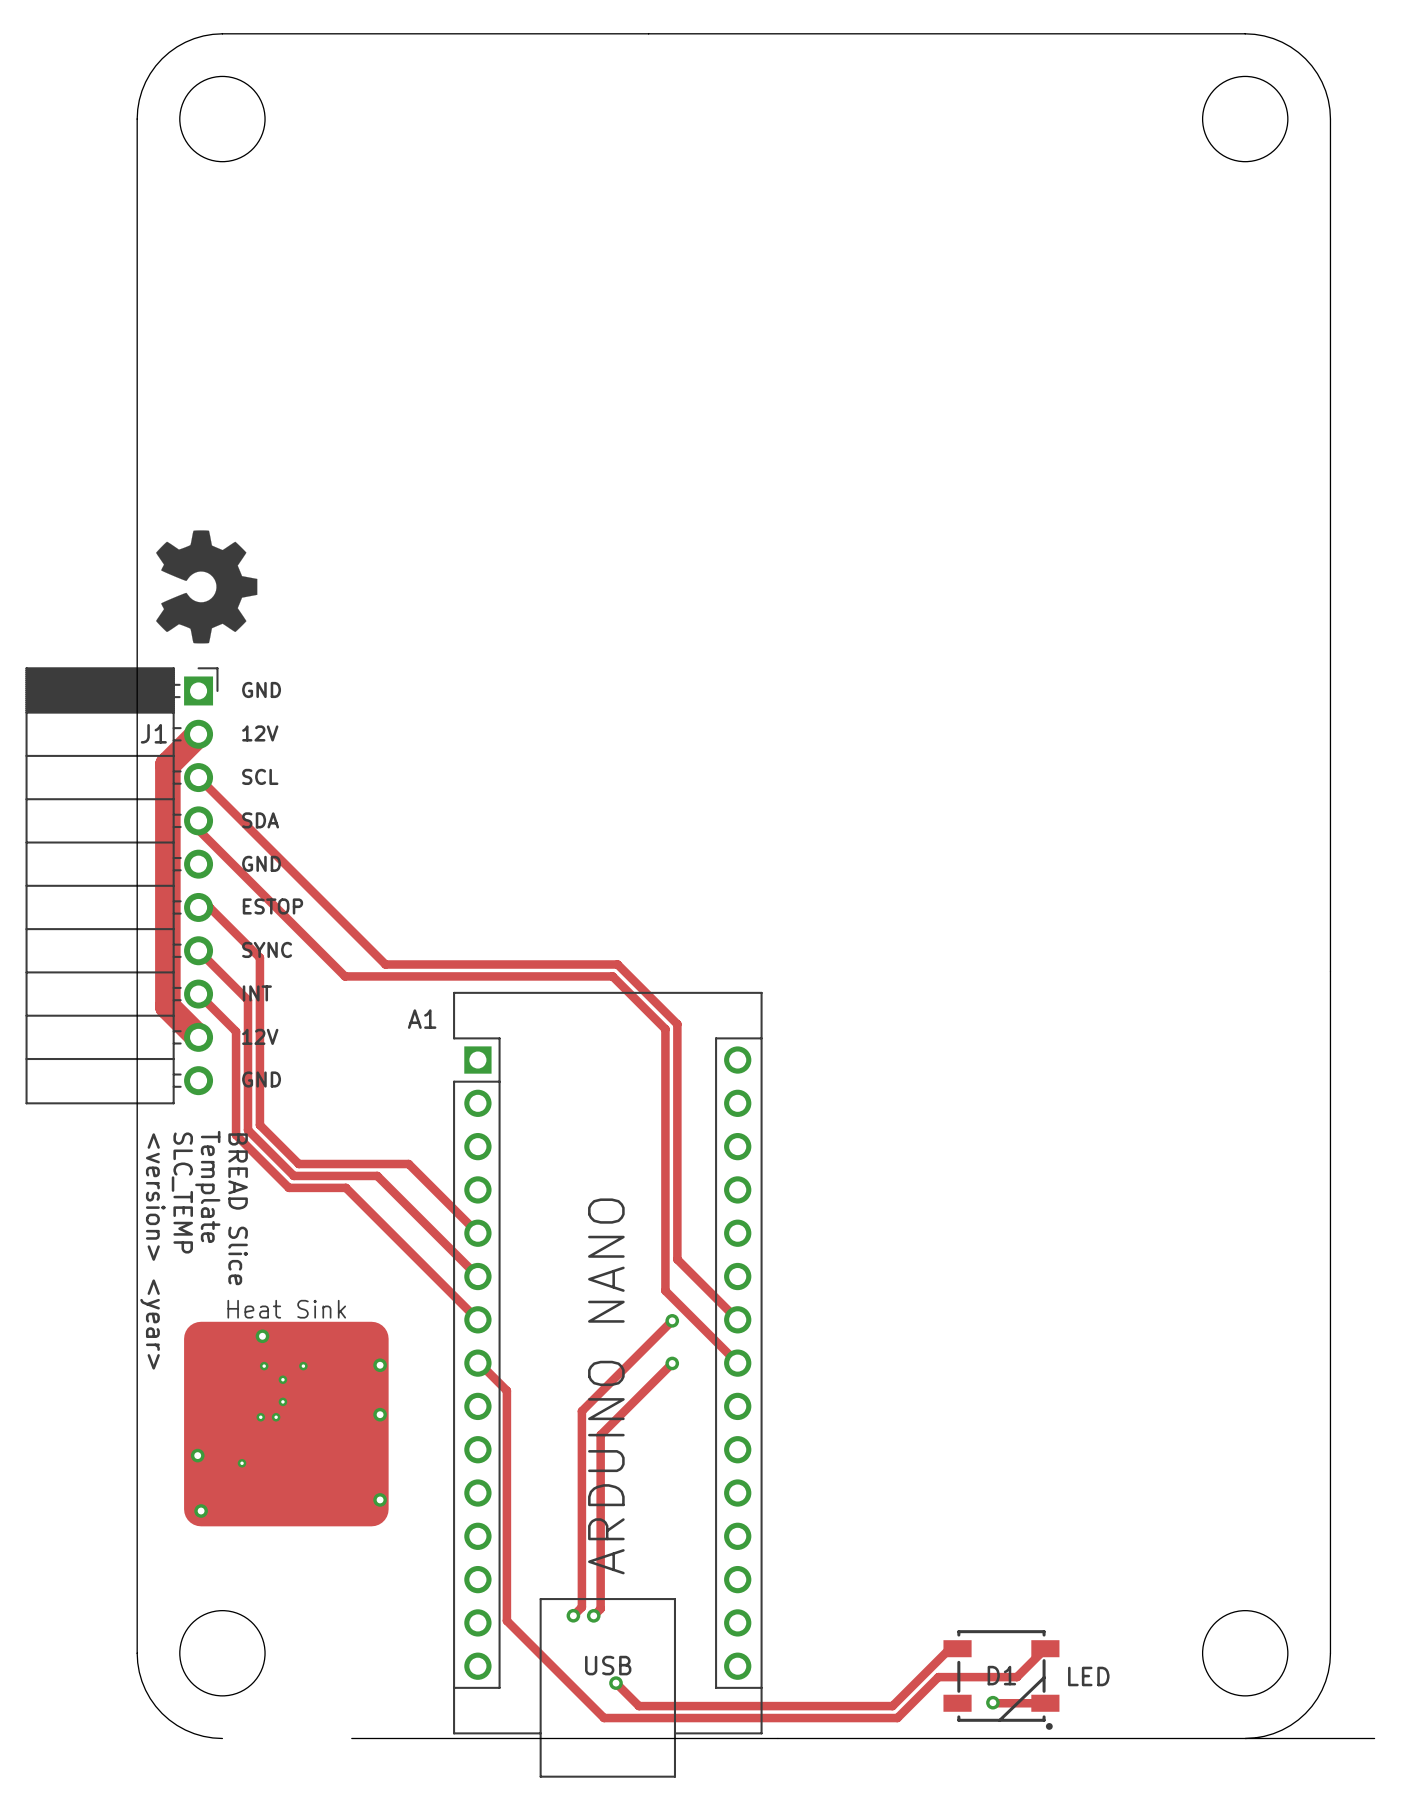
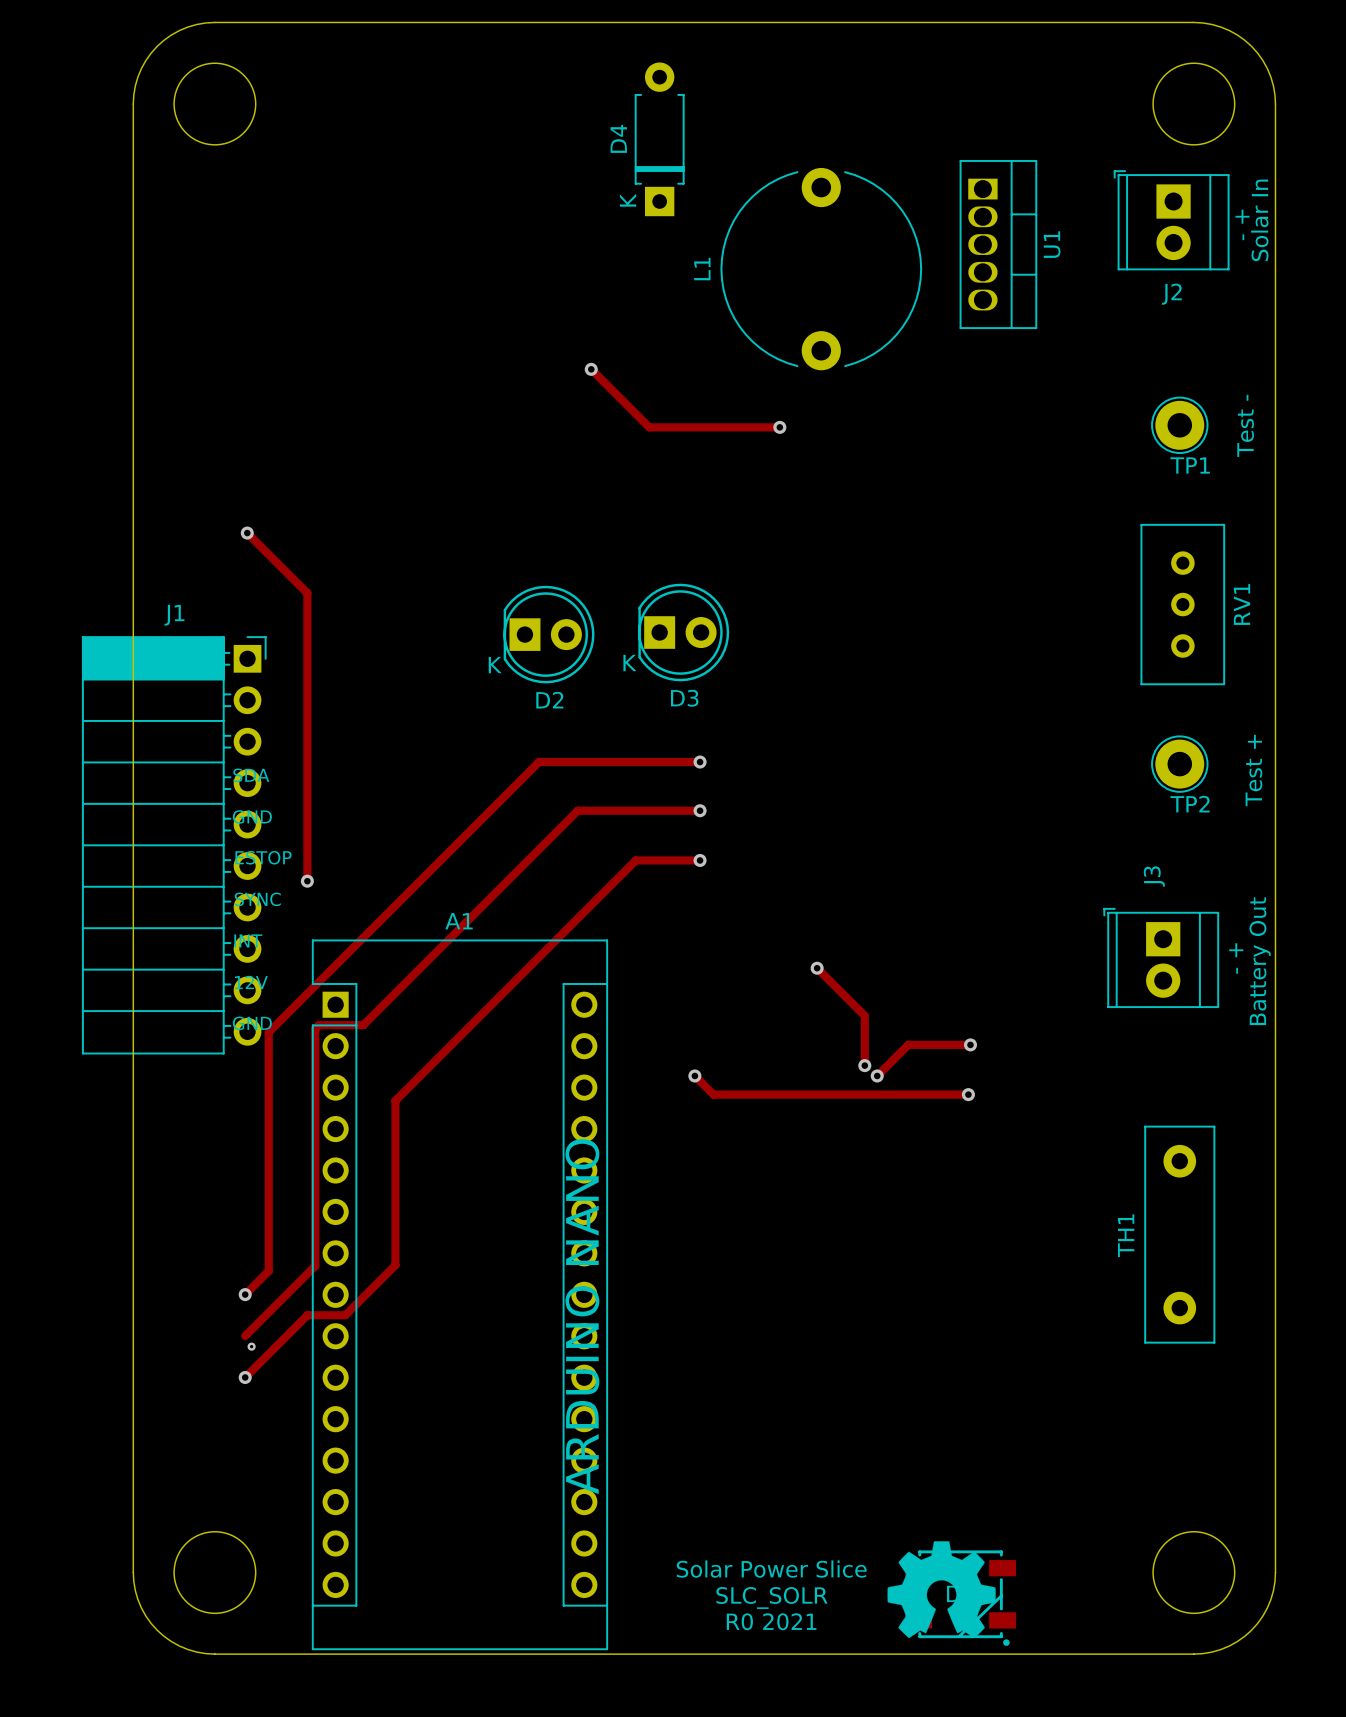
D4: none -> (659, 139)
J2: none -> (1171, 220)
text: none -> Solar In (1259, 220)
text: none -> - + (1242, 224)
U1: none -> (998, 244)
L1: none -> (821, 269)
track: none -> (591, 369) (649, 427) (779, 427)
via: none -> (591, 369)
TP1: none -> (1179, 425)
text: none -> Test - (1245, 425)
via: none -> (779, 427)
drawing: [156, 530, 258, 644] -> none
track: none -> (247, 533) (307, 593) (307, 881)
via: none -> (247, 533)
RV1: none -> (1182, 604)
D3: none -> (683, 632)
D2: none -> (548, 634)
text: GND (261, 689) -> none
J1 name position: J1 (153, 733) -> J1 (174, 615)
text: 12V (260, 733) -> none
track: (198, 734) (167, 764) (167, 1006) (198, 1037) -> none
text: SCL (260, 776) -> none
track: (198, 777) (385, 964) (617, 964) (677, 1024) (677, 1259) (737, 1319) -> none
track: none -> (700, 762) (539, 762) (268, 1032) (268, 1271) (245, 1294)
via: none -> (700, 762)
TP2: none -> (1179, 764)
text: none -> Test + (1253, 770)
track: (198, 820) (198, 829) (345, 976) (612, 976) (665, 1029) (665, 1290) (737, 1363) -> none
track: none -> (700, 810) (577, 810) (363, 1025) (318, 1025) (315, 1028) (315, 1266) (245, 1336)
via: none -> (700, 810)
J1 position: (122, 885) -> (174, 845)
track: (198, 907) (209, 907) (259, 957) (259, 1125) (298, 1164) (408, 1164) (477, 1233) -> none
track: none -> (700, 860) (635, 860) (395, 1100) (395, 1265) (345, 1315) (307, 1315) (245, 1377)
via: none -> (700, 860)
via: none -> (307, 881)
track: (198, 950) (247, 1000) (247, 1130) (293, 1175) (377, 1175) (477, 1276) -> none
A1 footprint: [453, 991, 763, 1778] -> [311, 939, 609, 1651]
track: (198, 994) (236, 1031) (236, 1135) (288, 1187) (345, 1187) (477, 1319) -> none
J3: none -> (1161, 957)
text: none -> - + (1236, 958)
text: none -> Battery Out (1260, 961)
A1 name position: A1 (422, 1019) -> A1 (459, 921)
track: none -> (817, 968) (864, 1015) (864, 1065)
via: none -> (817, 968)
track: none -> (970, 1044) (908, 1044) (877, 1075)
via: none -> (970, 1044)
via: none -> (864, 1065)
track: none -> (694, 1075) (713, 1094) (968, 1094)
via: none -> (694, 1075)
via: none -> (877, 1075)
via: none -> (968, 1094)
text: Template (207, 1186) -> none
text: SLC_TEMP (182, 1193) -> none
text: BREAD Slice (238, 1209) -> none
text: <version> <year> (152, 1251) -> none
TH1: none -> (1179, 1234)
track: (672, 1320) (581, 1411) (581, 1607) (573, 1615) -> none
via: (672, 1320) -> none
via position: (262, 1336) -> (245, 1294)
track: (477, 1363) (506, 1390) (506, 1620) (604, 1718) (897, 1718) (938, 1677) (1016, 1677) (1045, 1648) -> none
track: (672, 1363) (600, 1435) (600, 1608) (593, 1615) -> none
via: (672, 1363) -> none
via: (380, 1365) -> none
via: (264, 1366) -> none
via: (303, 1366) -> none
via: (282, 1379) -> none
via: (282, 1401) -> none
via: (380, 1414) -> none
via: (276, 1417) -> none
part: (286, 1424) -> none
via: none -> (245, 1377)
via: (197, 1455) -> none
via: (242, 1463) -> none
via: (380, 1499) -> none
via: (201, 1511) -> none
via: (573, 1615) -> none
via: (593, 1615) -> none
drawing: none -> [887, 1541, 996, 1639]
track: (957, 1648) (949, 1648) (892, 1706) (639, 1706) (615, 1683) -> none
text: none -> Solar Power Slice (771, 1569)
text: LED (1088, 1676) -> none
text: none -> SLC_SOLR (771, 1597)
via: (615, 1683) -> none
track: (992, 1702) (1045, 1703) -> none
via: (992, 1702) -> none
text: none -> R0 2021 (771, 1621)
board edge: none -> (214, 1654) (338, 1654)
board edge: (1245, 1738) (1374, 1738) -> none

